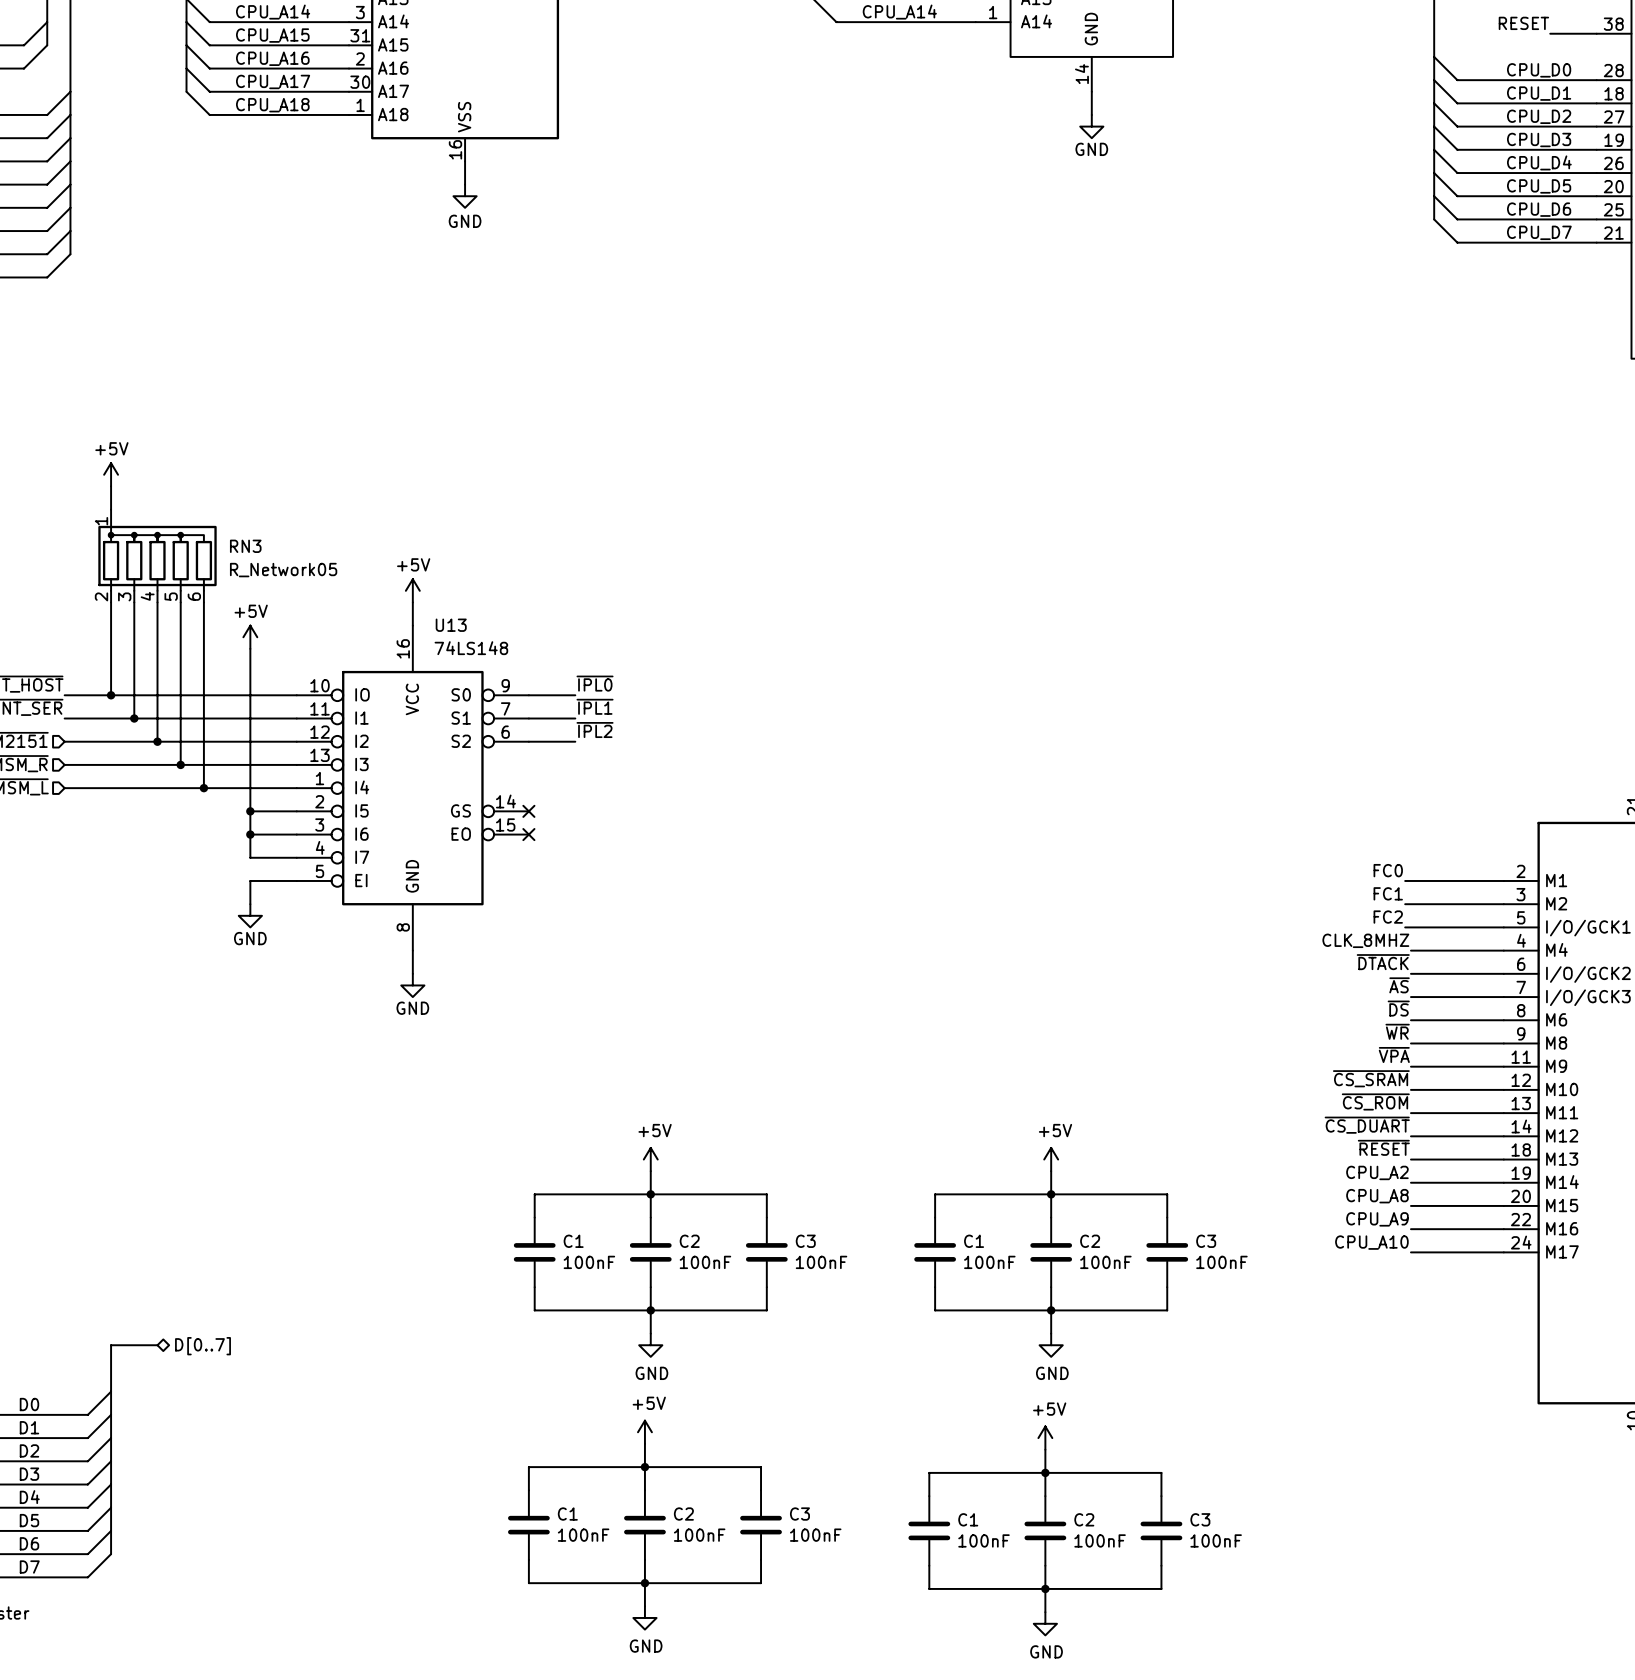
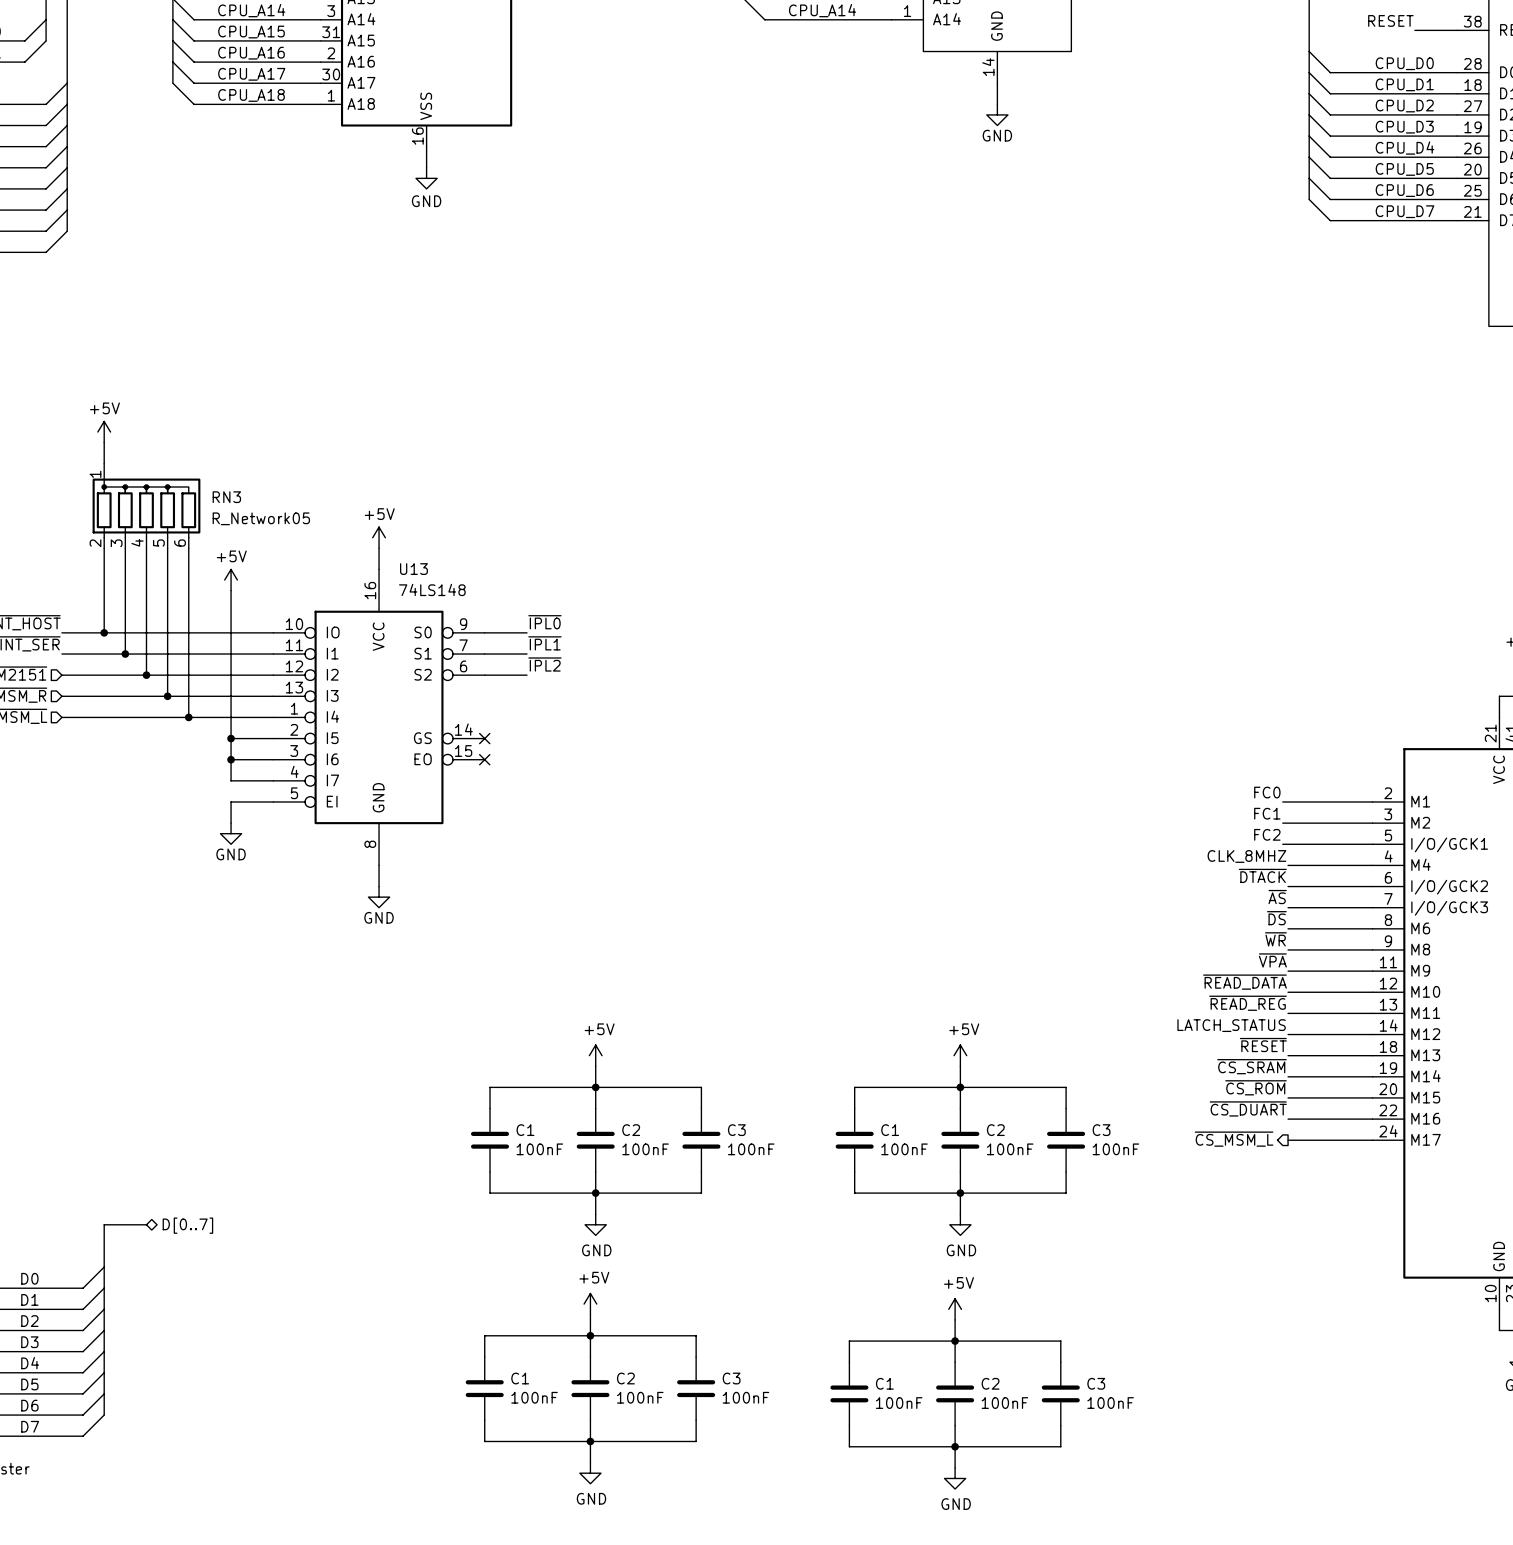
label: ~{CS_SRAM} (1371, 1078) -> ~{READ_DATA} (1244, 982)
label: ~{CS_ROM} (1375, 1101) -> ~{READ_REG} (1247, 1003)
label: ~{CS_DUART} (1367, 1125) -> LATCH_STATUS (1231, 1025)
label: CPU_A2 (1377, 1172) -> ~{CS_SRAM} (1251, 1066)
label: CPU_A8 (1377, 1196) -> ~{CS_ROM} (1256, 1087)
label: CPU_A9 (1377, 1219) -> ~{CS_DUART} (1248, 1108)
label: CPU_A10 (1371, 1242) -> none
hierarchical label: none -> ~{CS_MSM_L} (1234, 1139)

